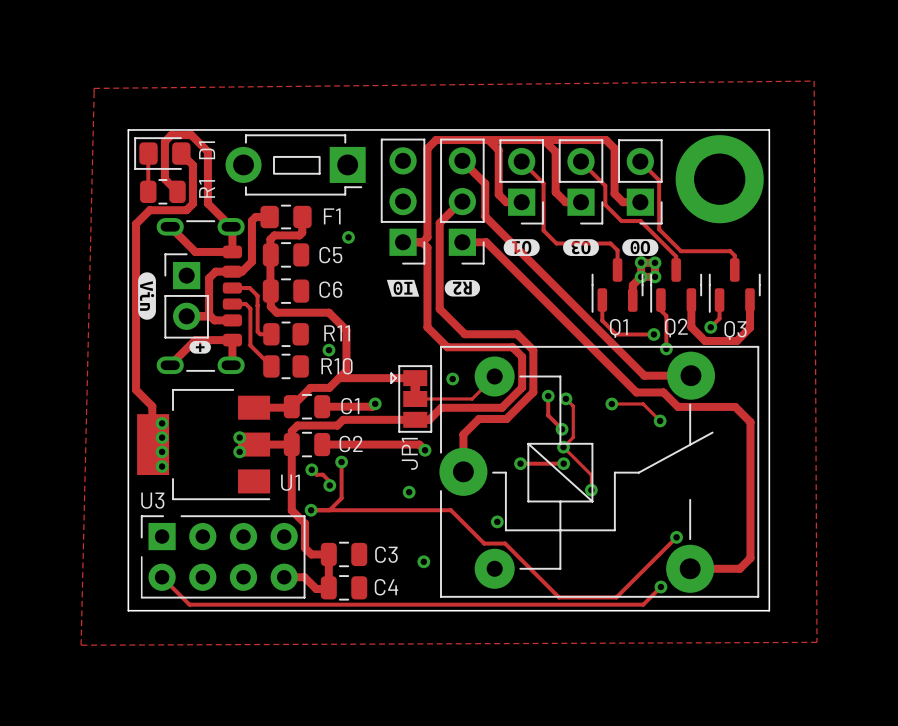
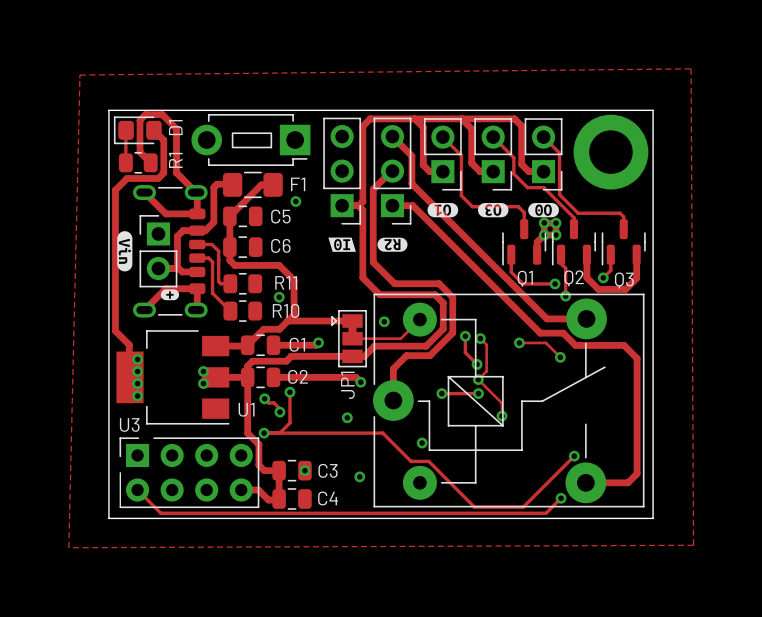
F1 footprint: [260, 204, 312, 230] -> [222, 171, 283, 199]
track: (302, 217) (302, 232) (299, 235) (274, 235) (270, 239) (270, 287) -> none
track: none -> (273, 184) (261, 184) (229, 216) (229, 247)
via: none -> (304, 470)

